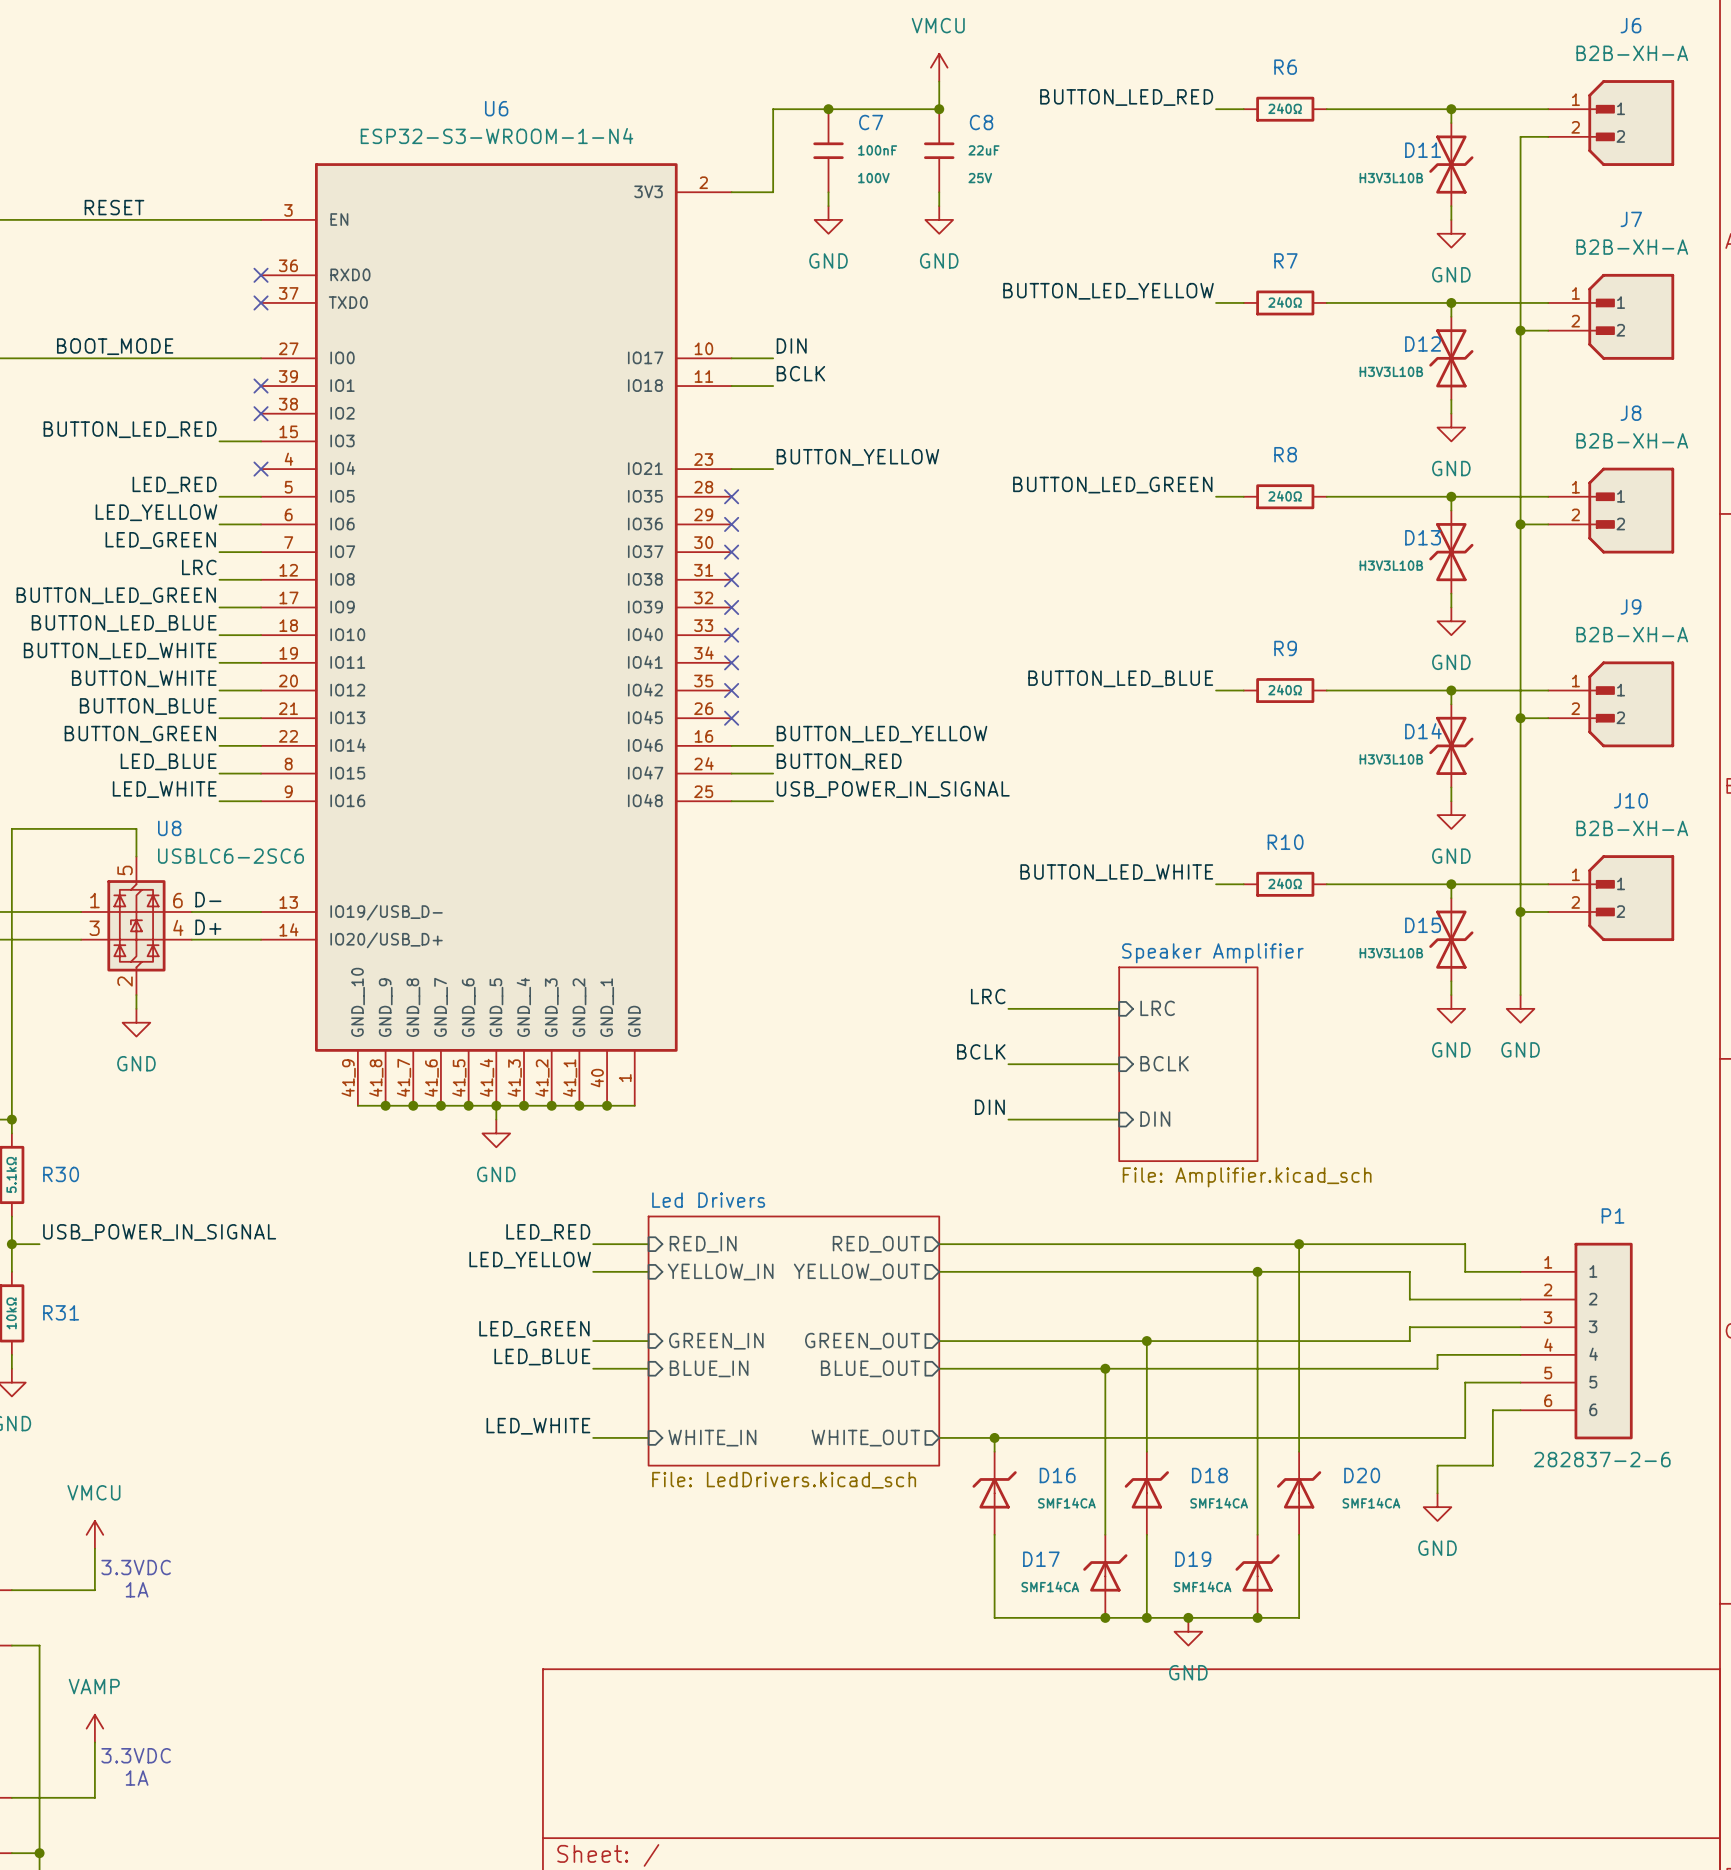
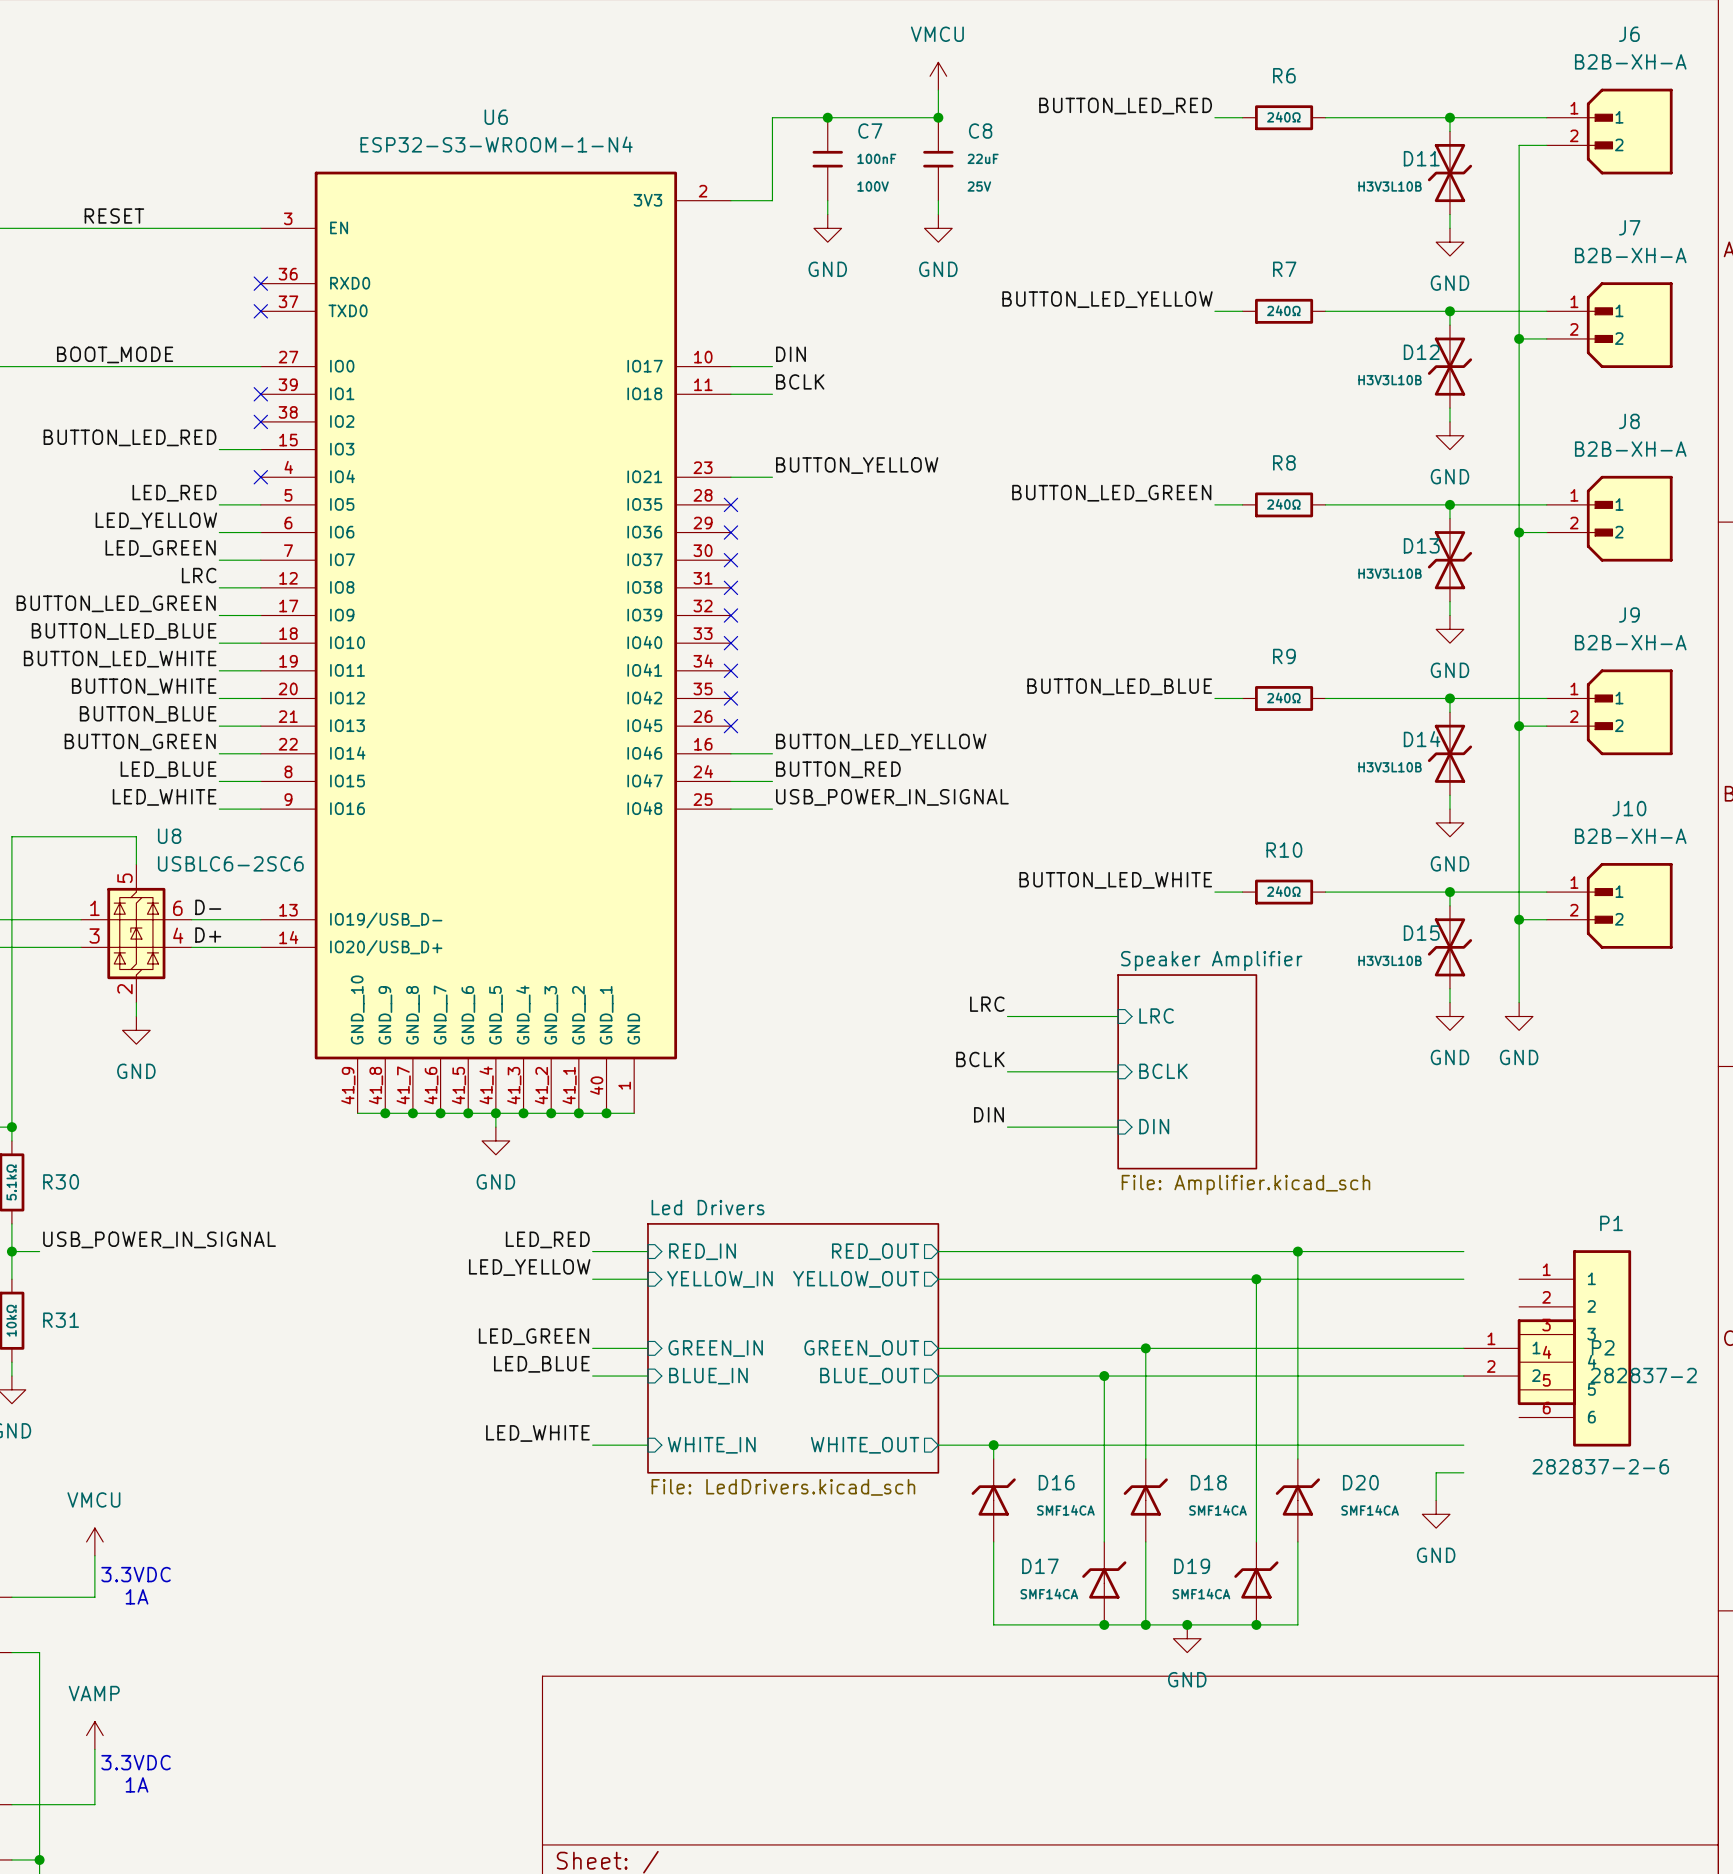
wire: (1465, 1244) (1465, 1271) (1520, 1271) -> none
wire: (1409, 1271) (1409, 1299) (1520, 1299) -> (1408, 1279) (1463, 1279)
wire: (1520, 1327) (1409, 1327) (1409, 1341) -> (1463, 1348) (1408, 1348)
wire: (1520, 1354) (1437, 1354) (1437, 1368) -> (1463, 1376) (1436, 1376)
P2: none -> 282837-2 (1519, 1362)
wire: (1520, 1382) (1465, 1382) (1465, 1437) -> none
wire: (1520, 1410) (1492, 1410) (1492, 1465) (1465, 1465) -> none

